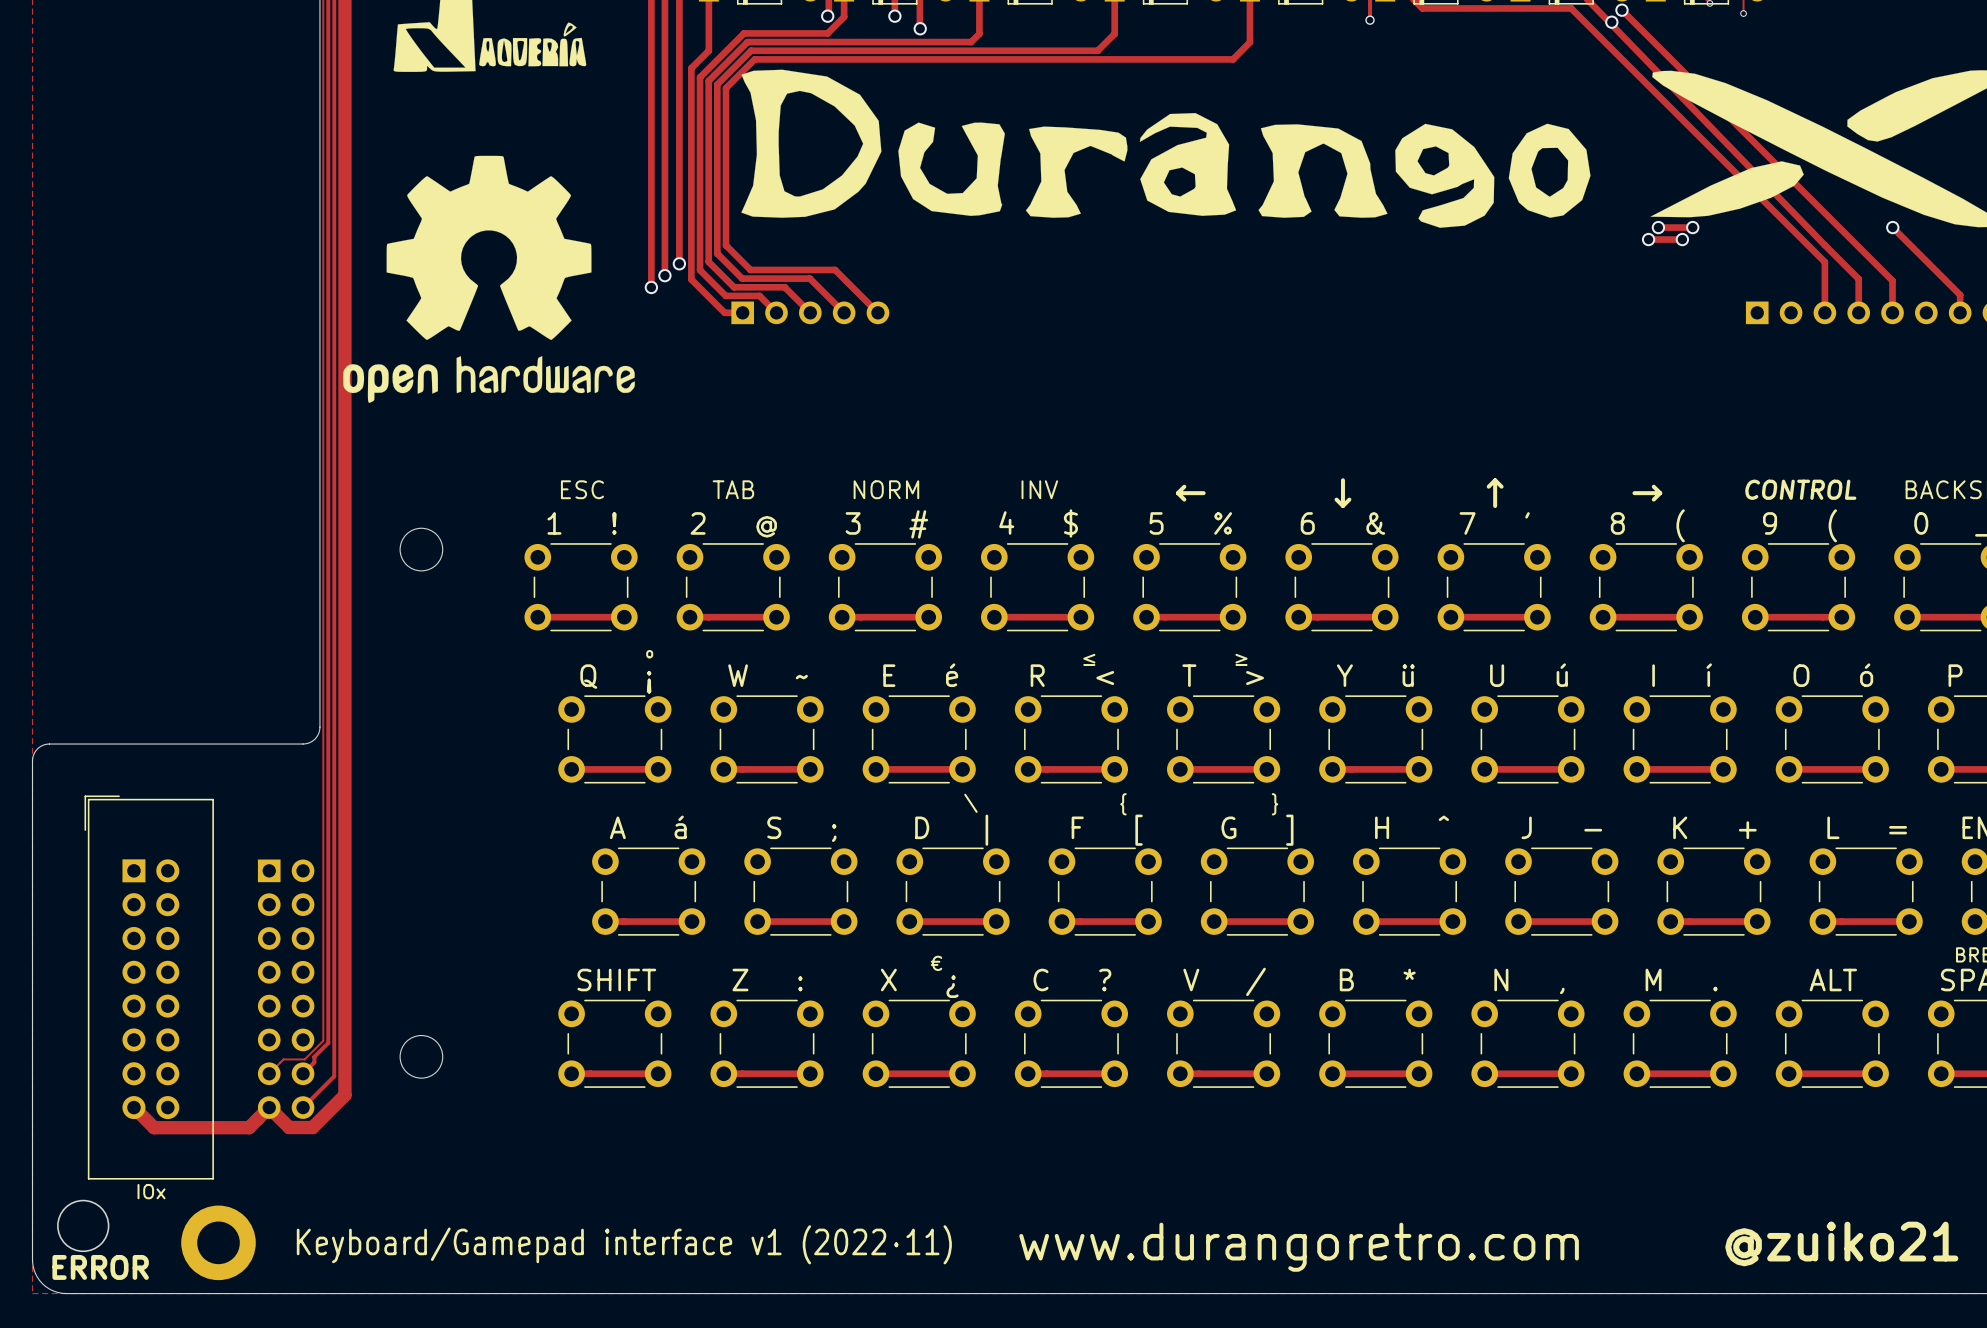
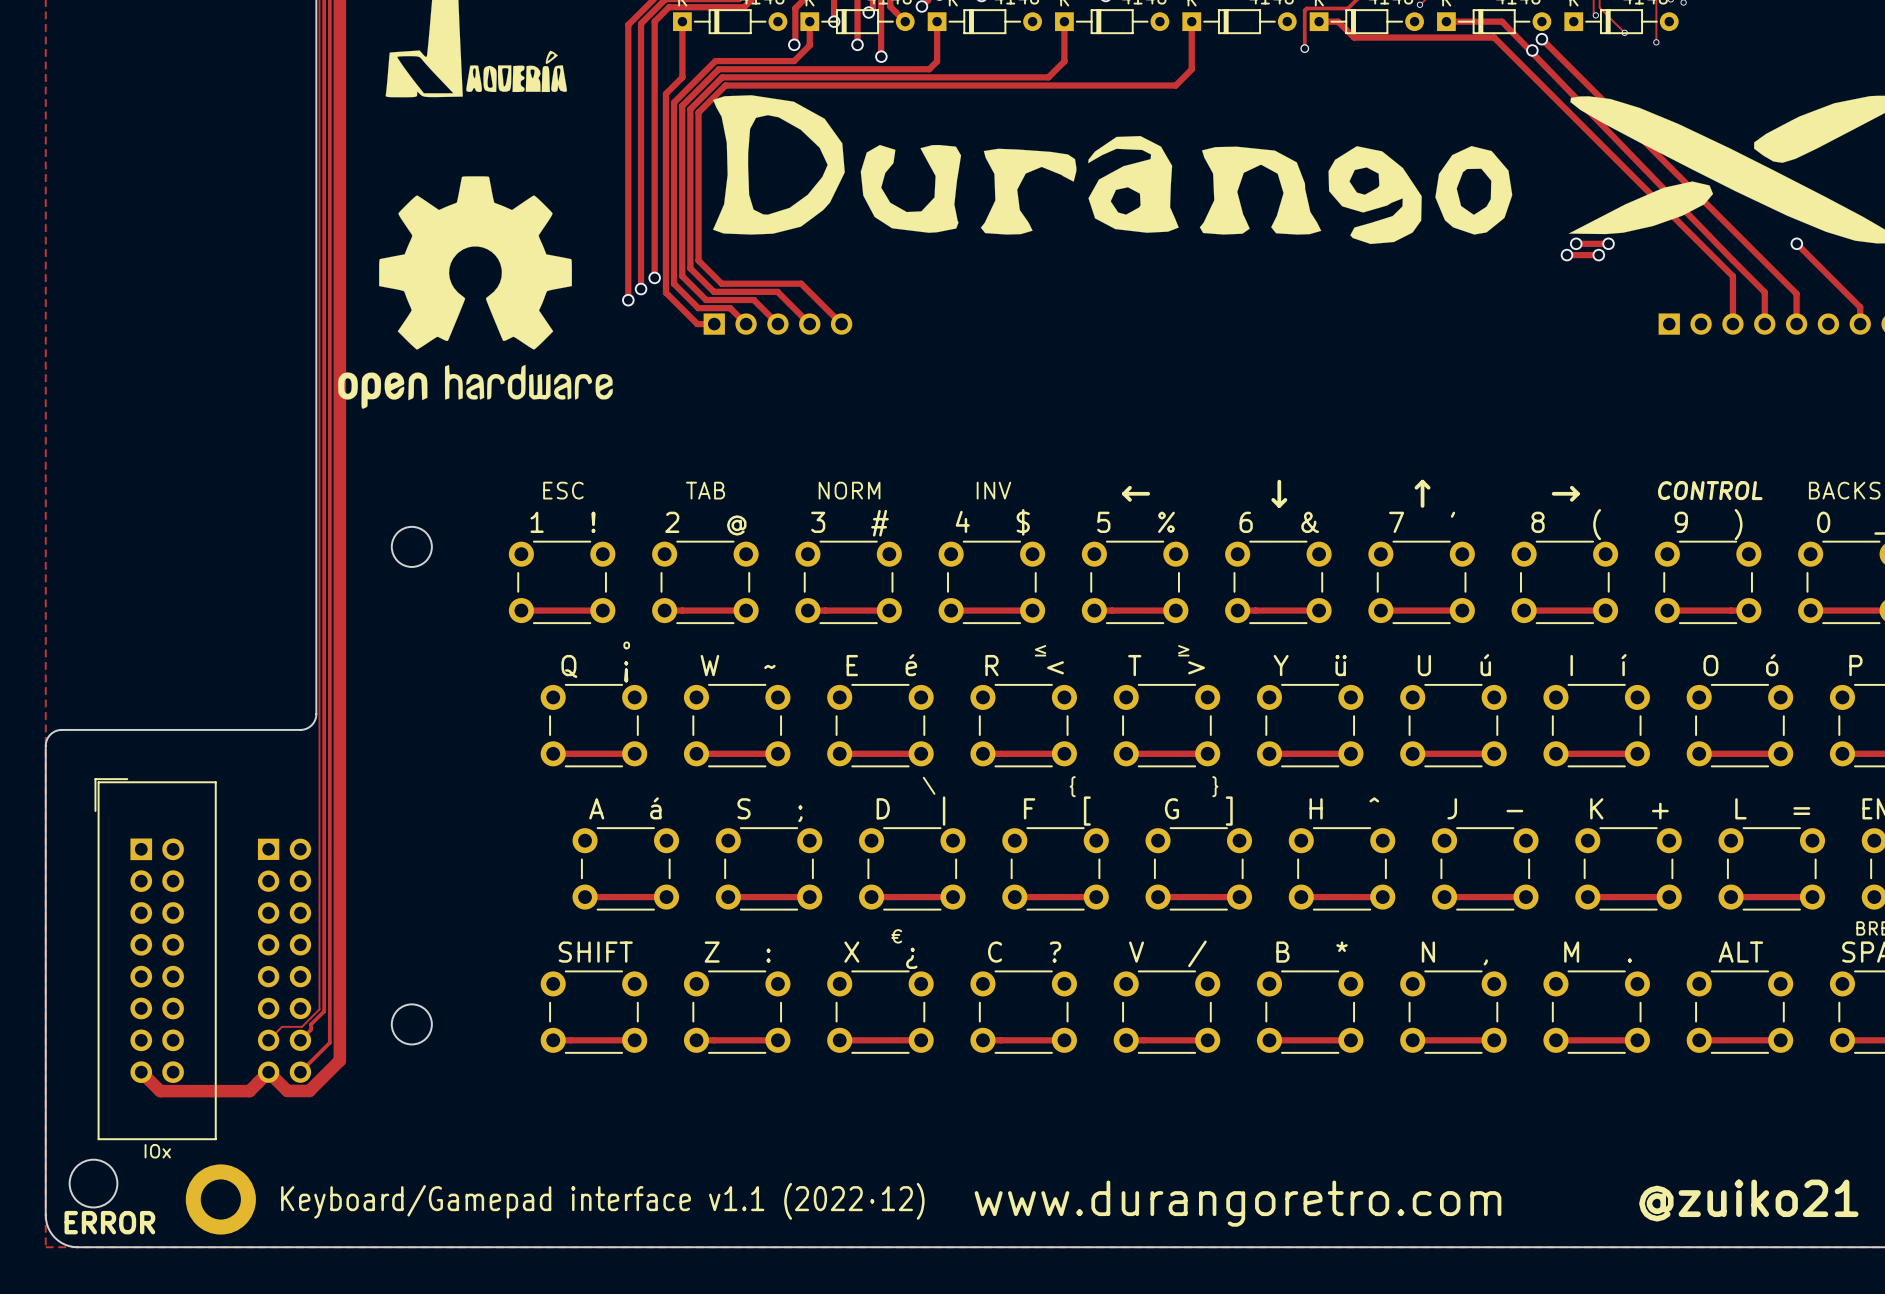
part value: 9 ( (1799, 525) -> 9 ) (1708, 524)
text: Keyboard/Gamepad interface v1 (2022·11) (624, 1244) -> Keyboard/Gamepad interface v1.1 (2022·12) (602, 1201)

